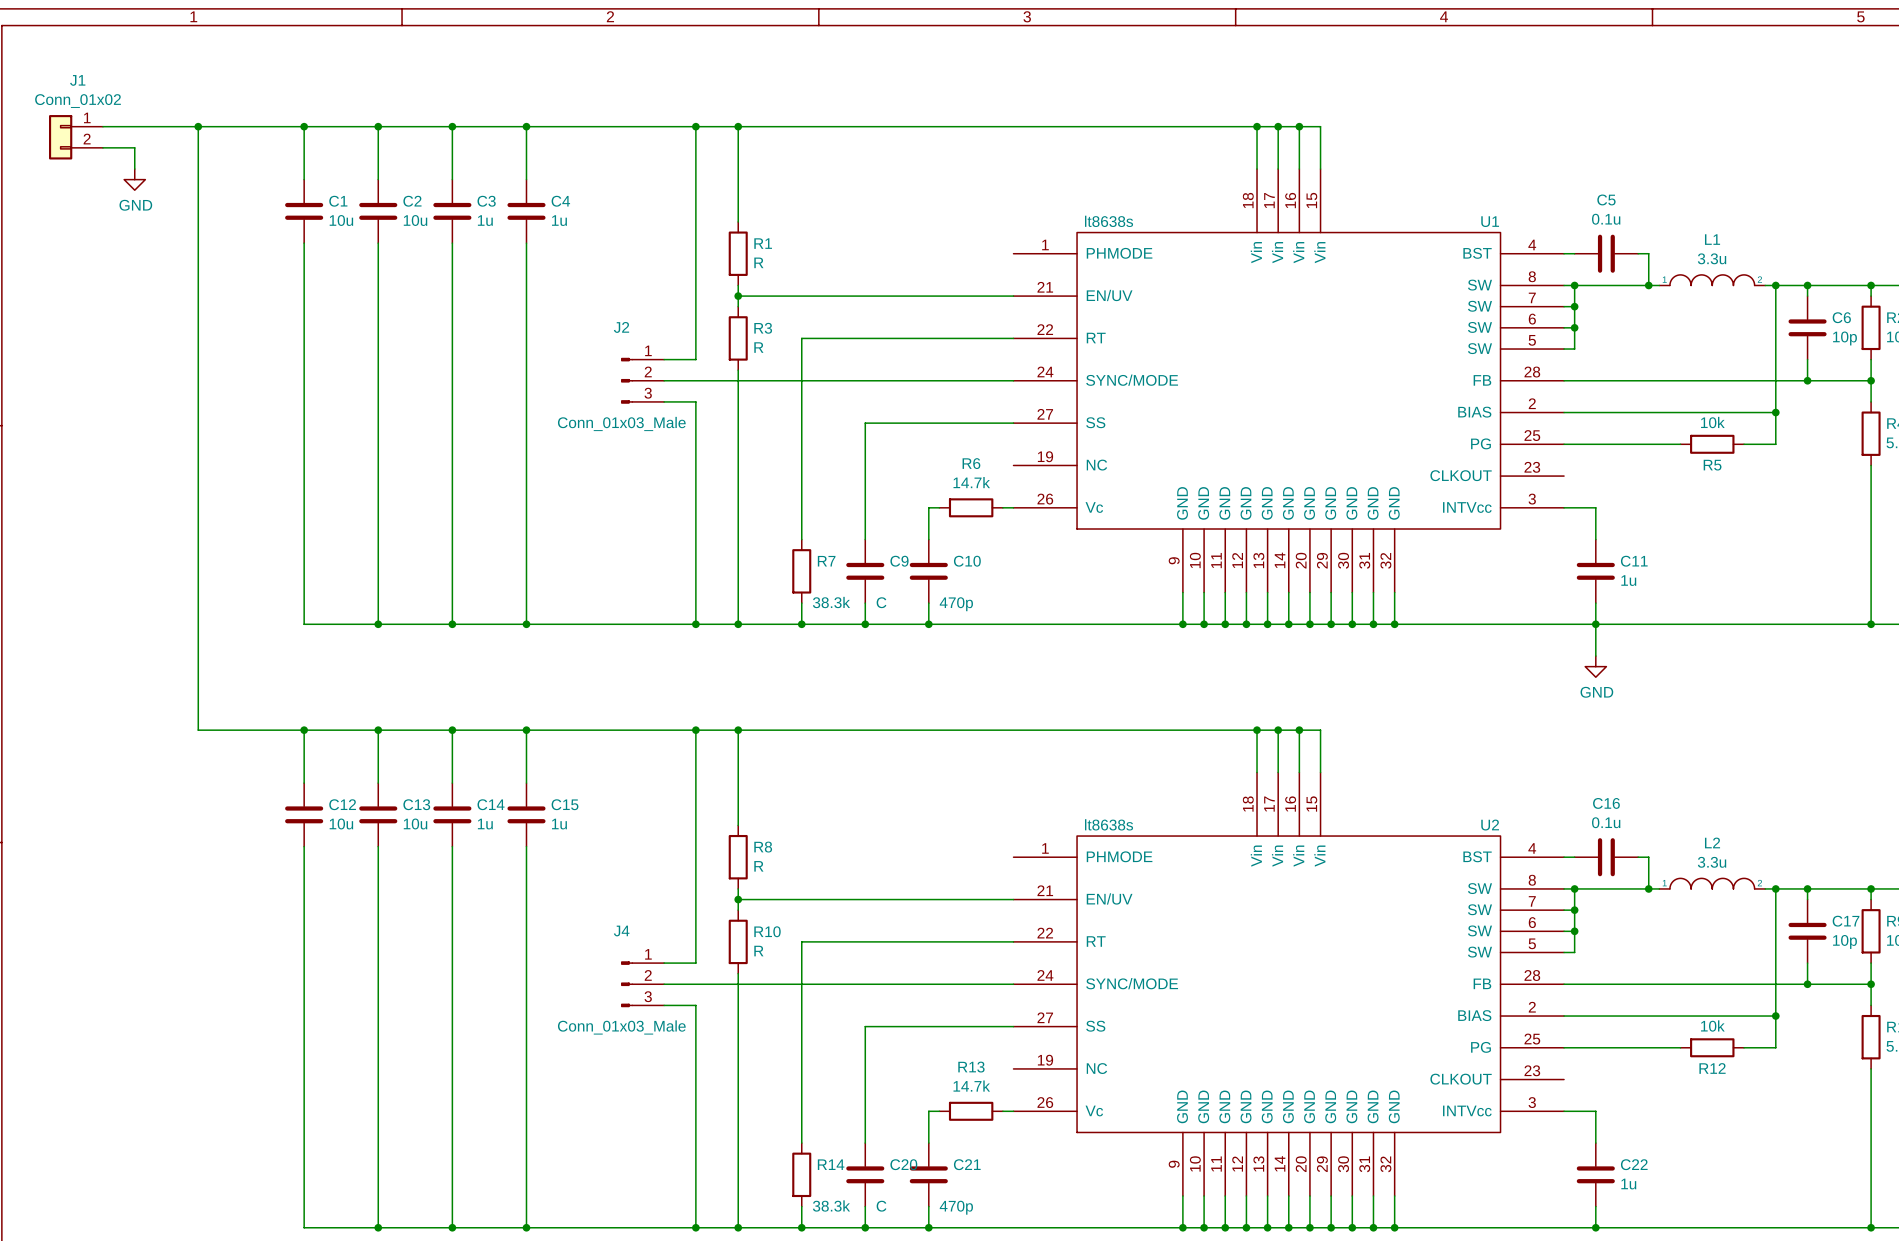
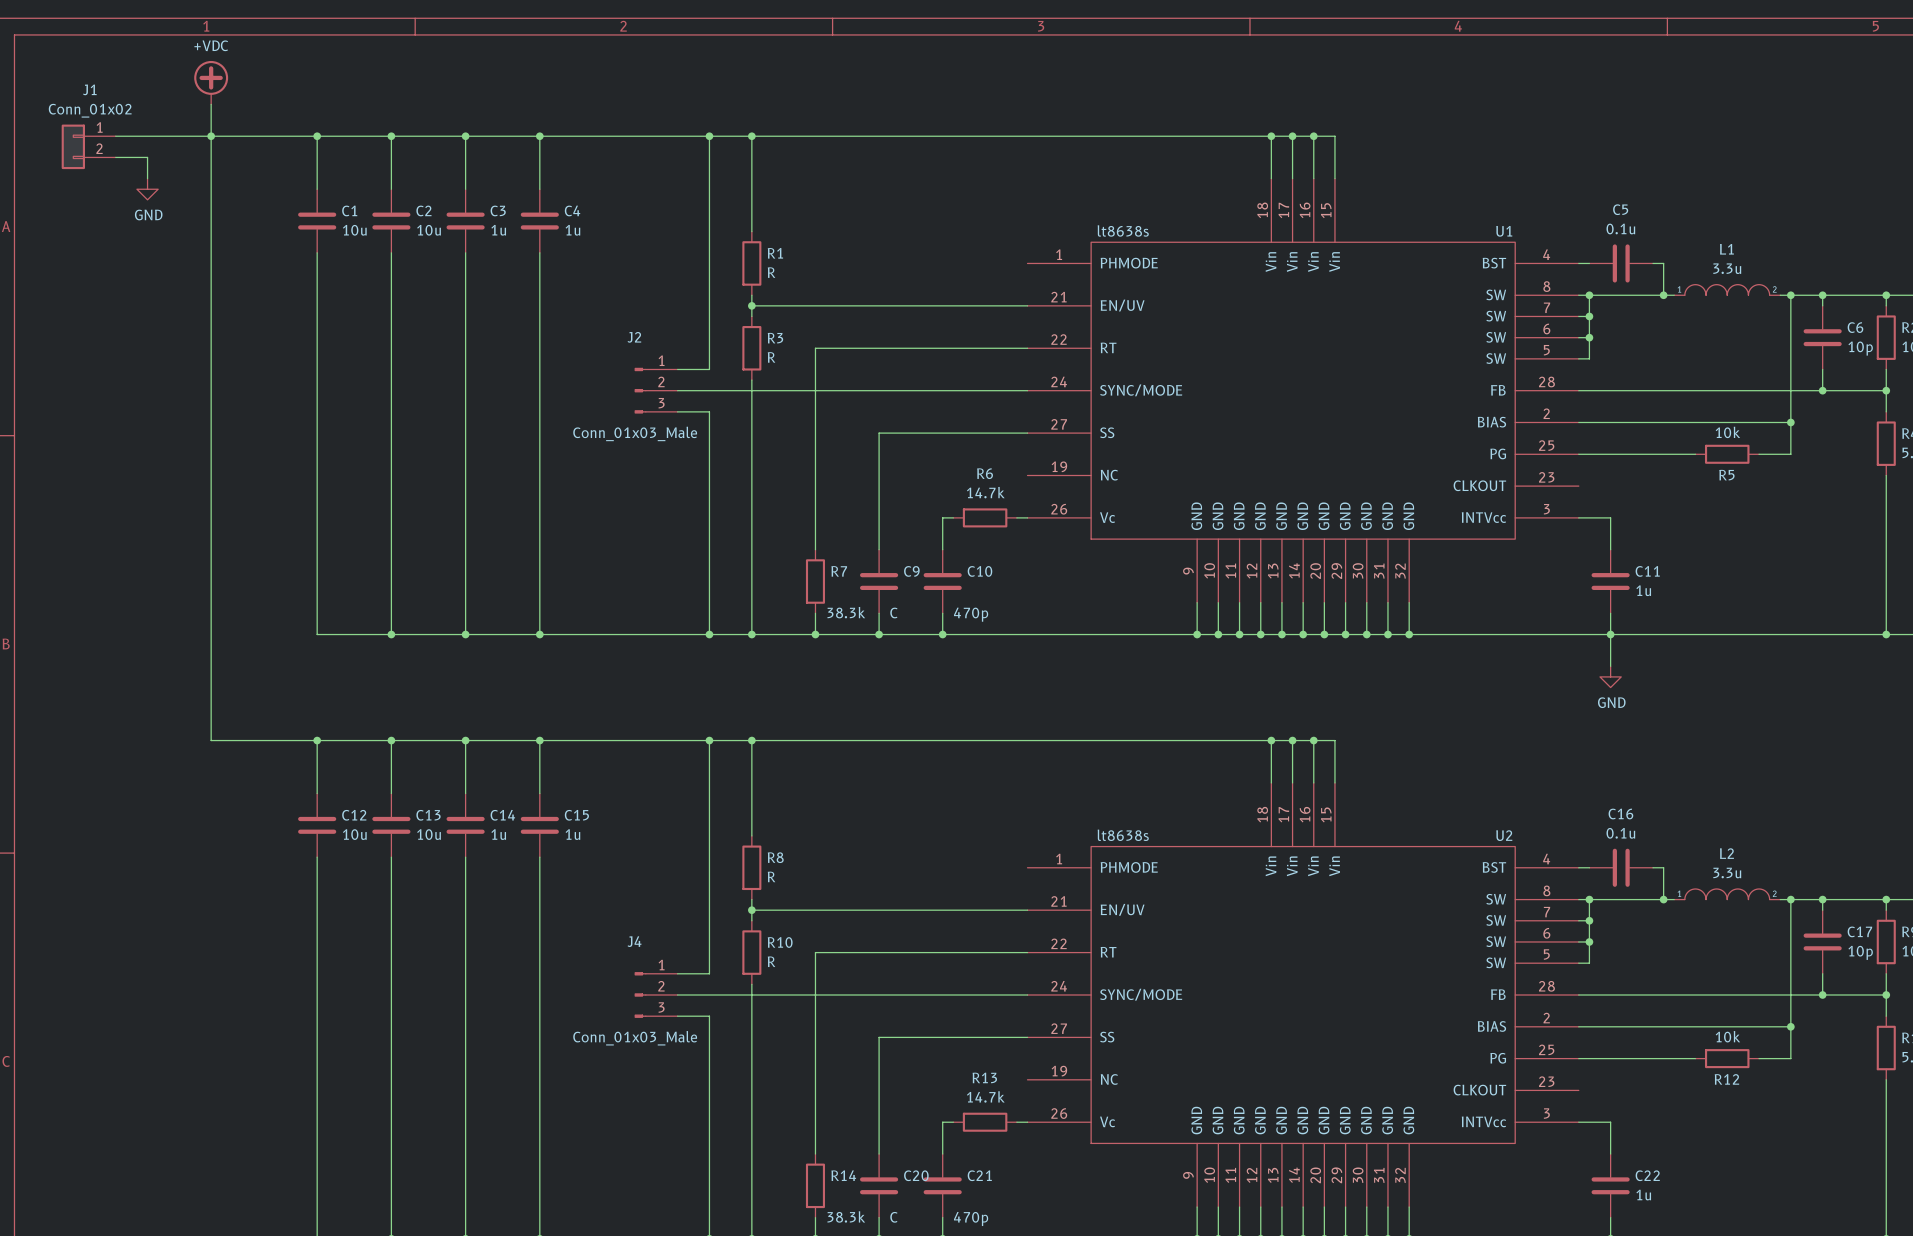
power symbol: none -> +VDC (211, 82)
wire: none -> (211, 104) (211, 136)

